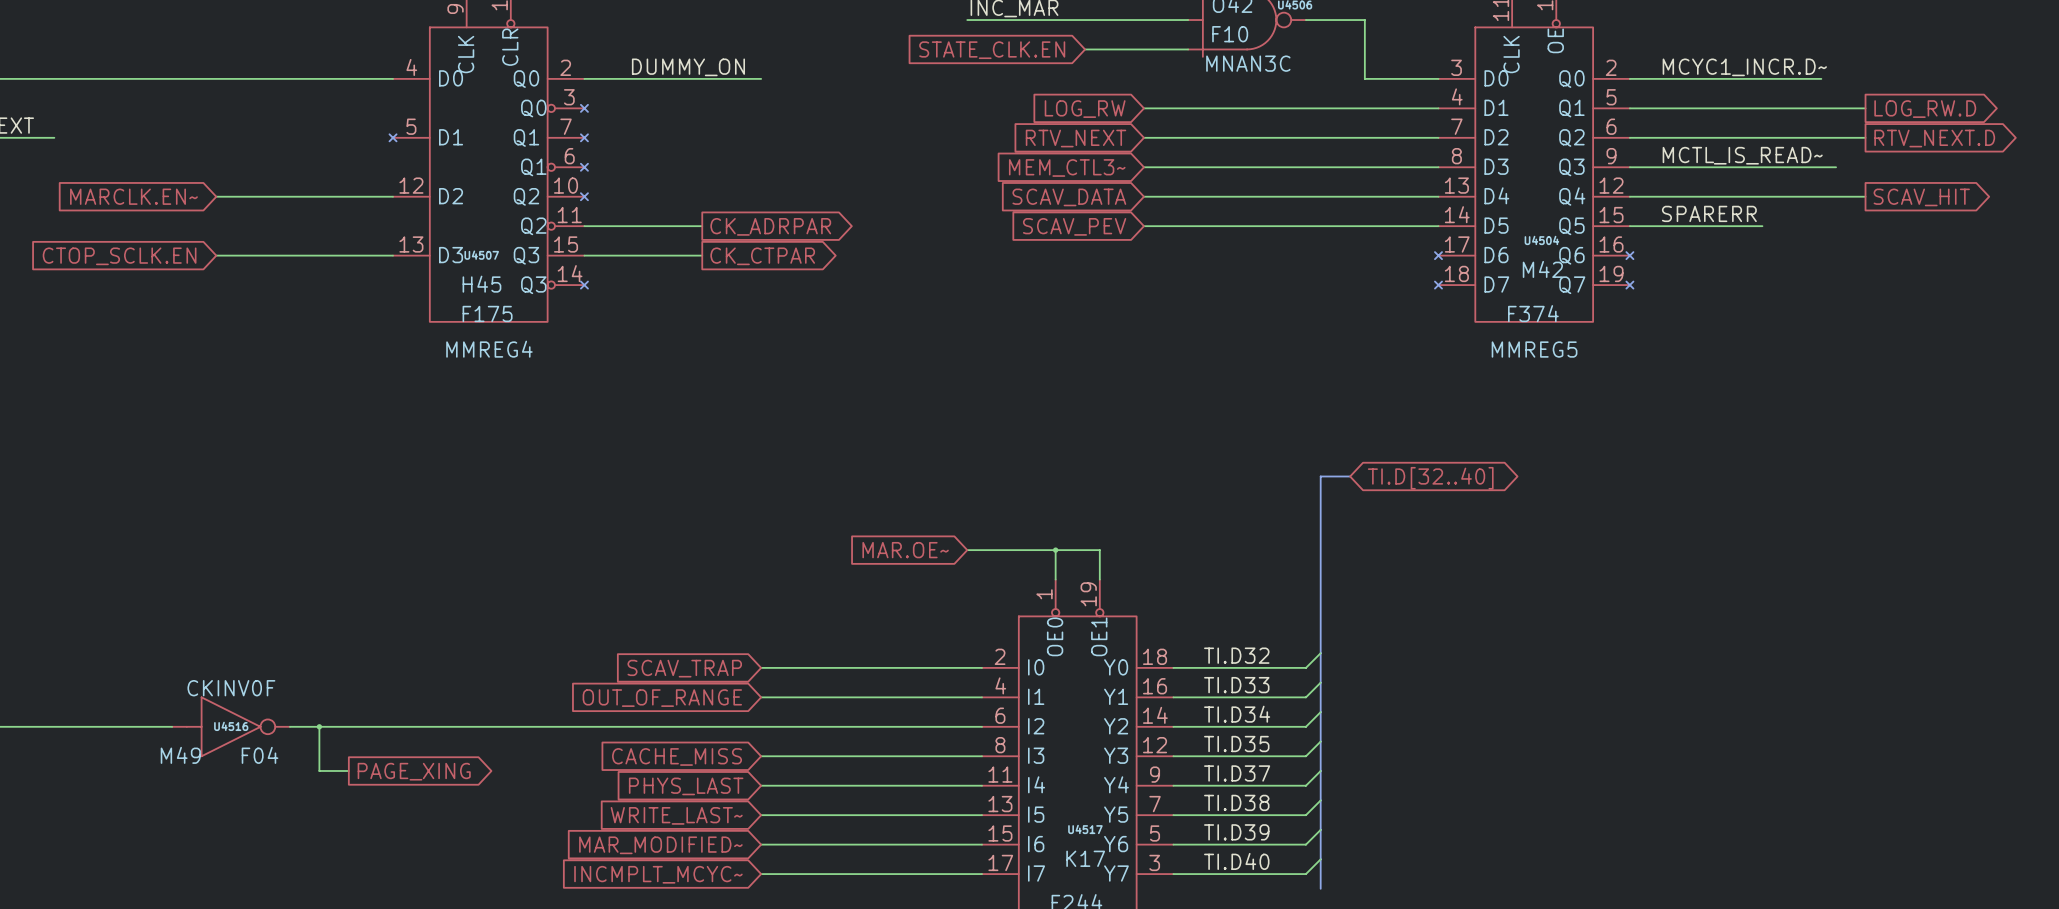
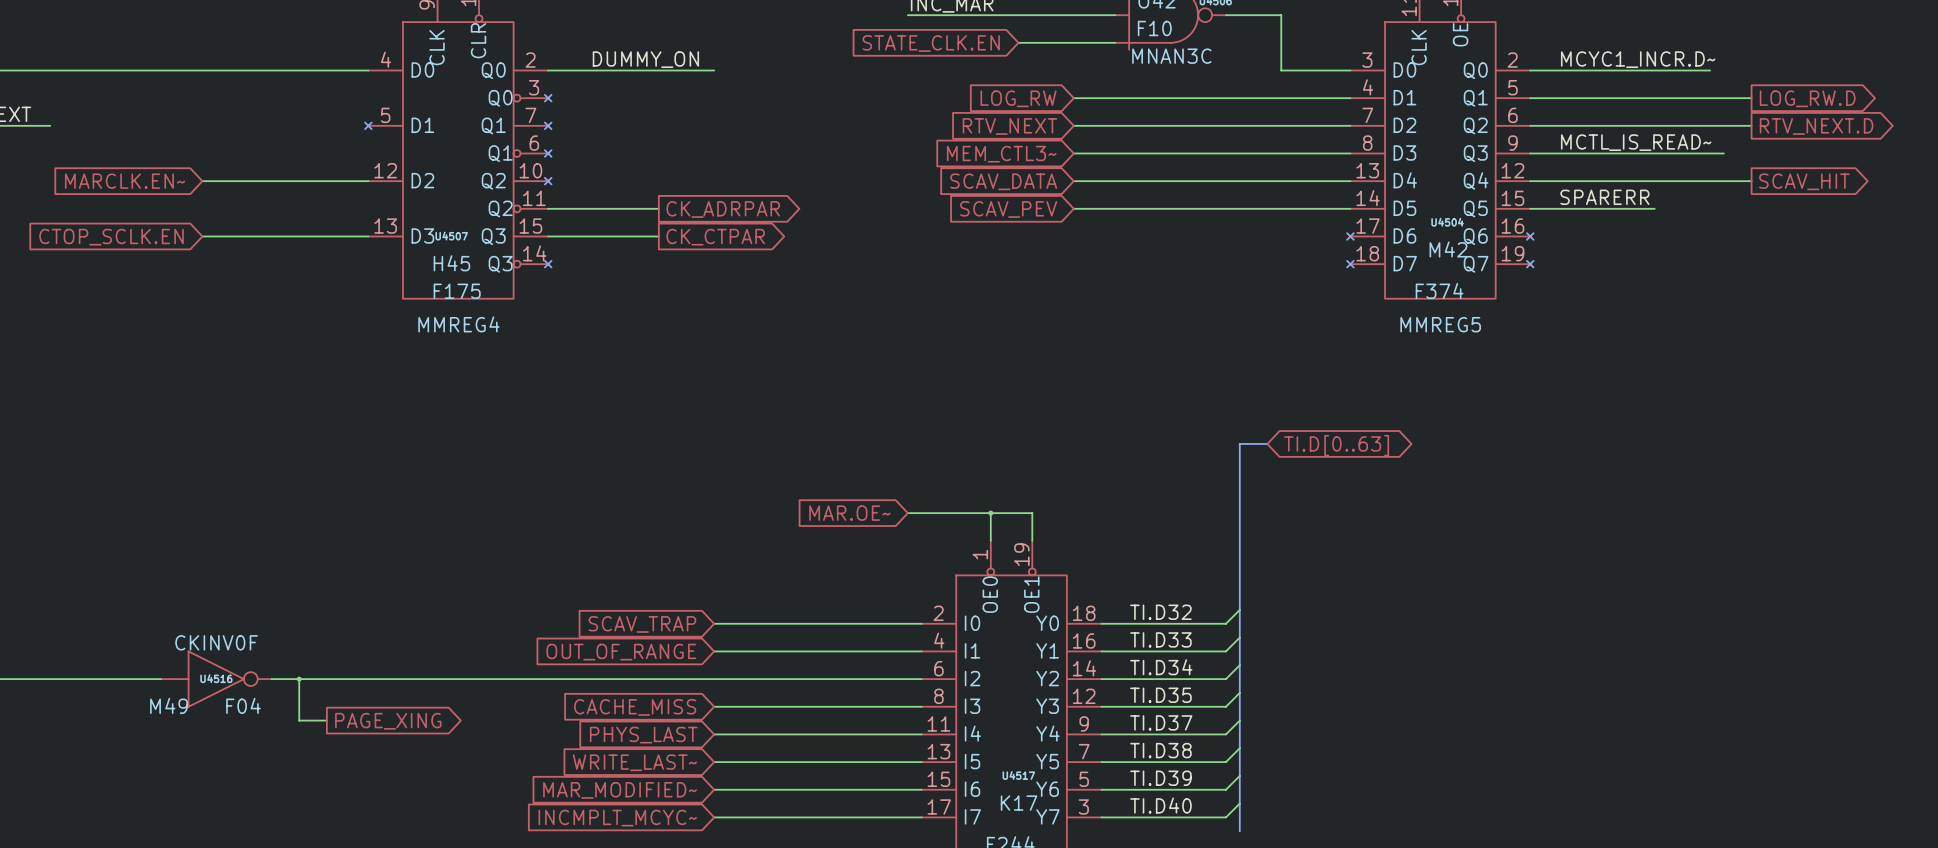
global label: TI.D[32..40] (1430, 478) -> TI.D[0..63] (1336, 445)

